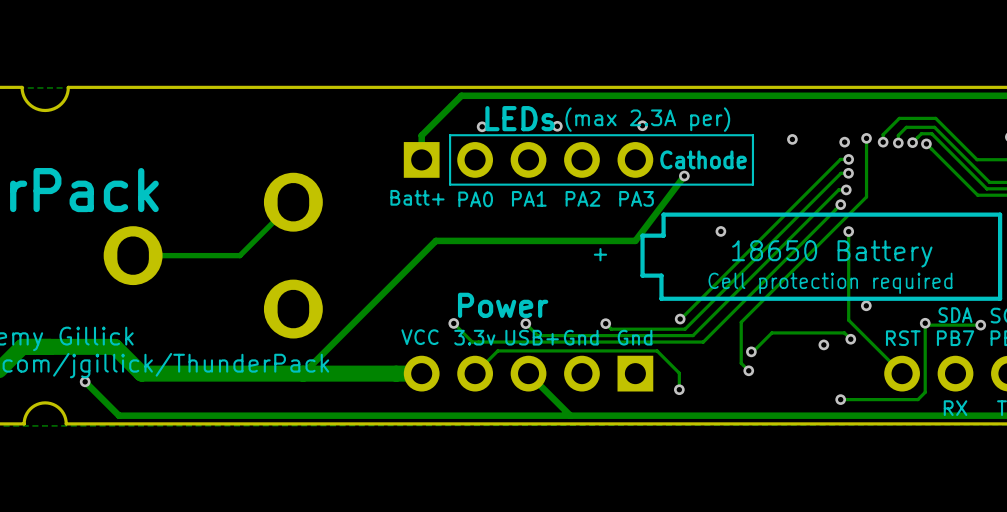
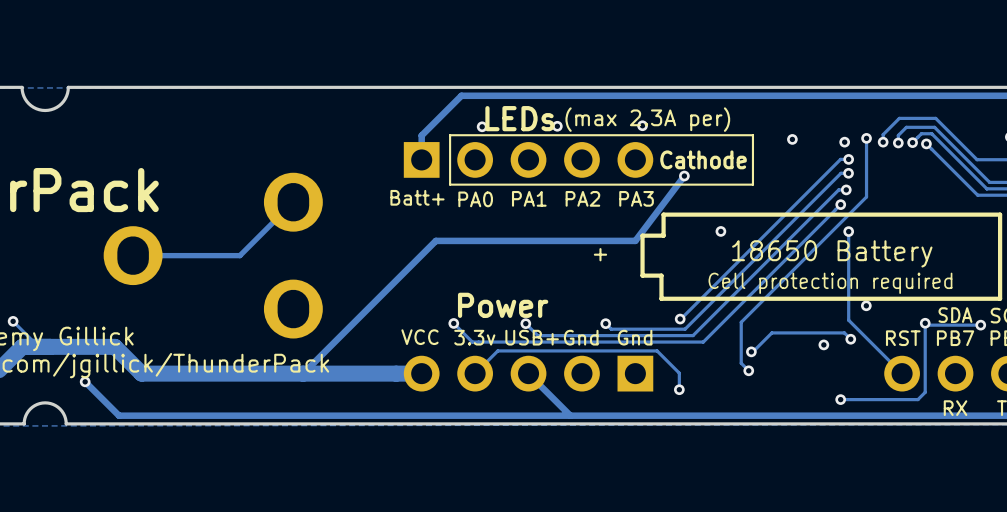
track: none -> (13, 321) (37, 346)
via: none -> (13, 321)

